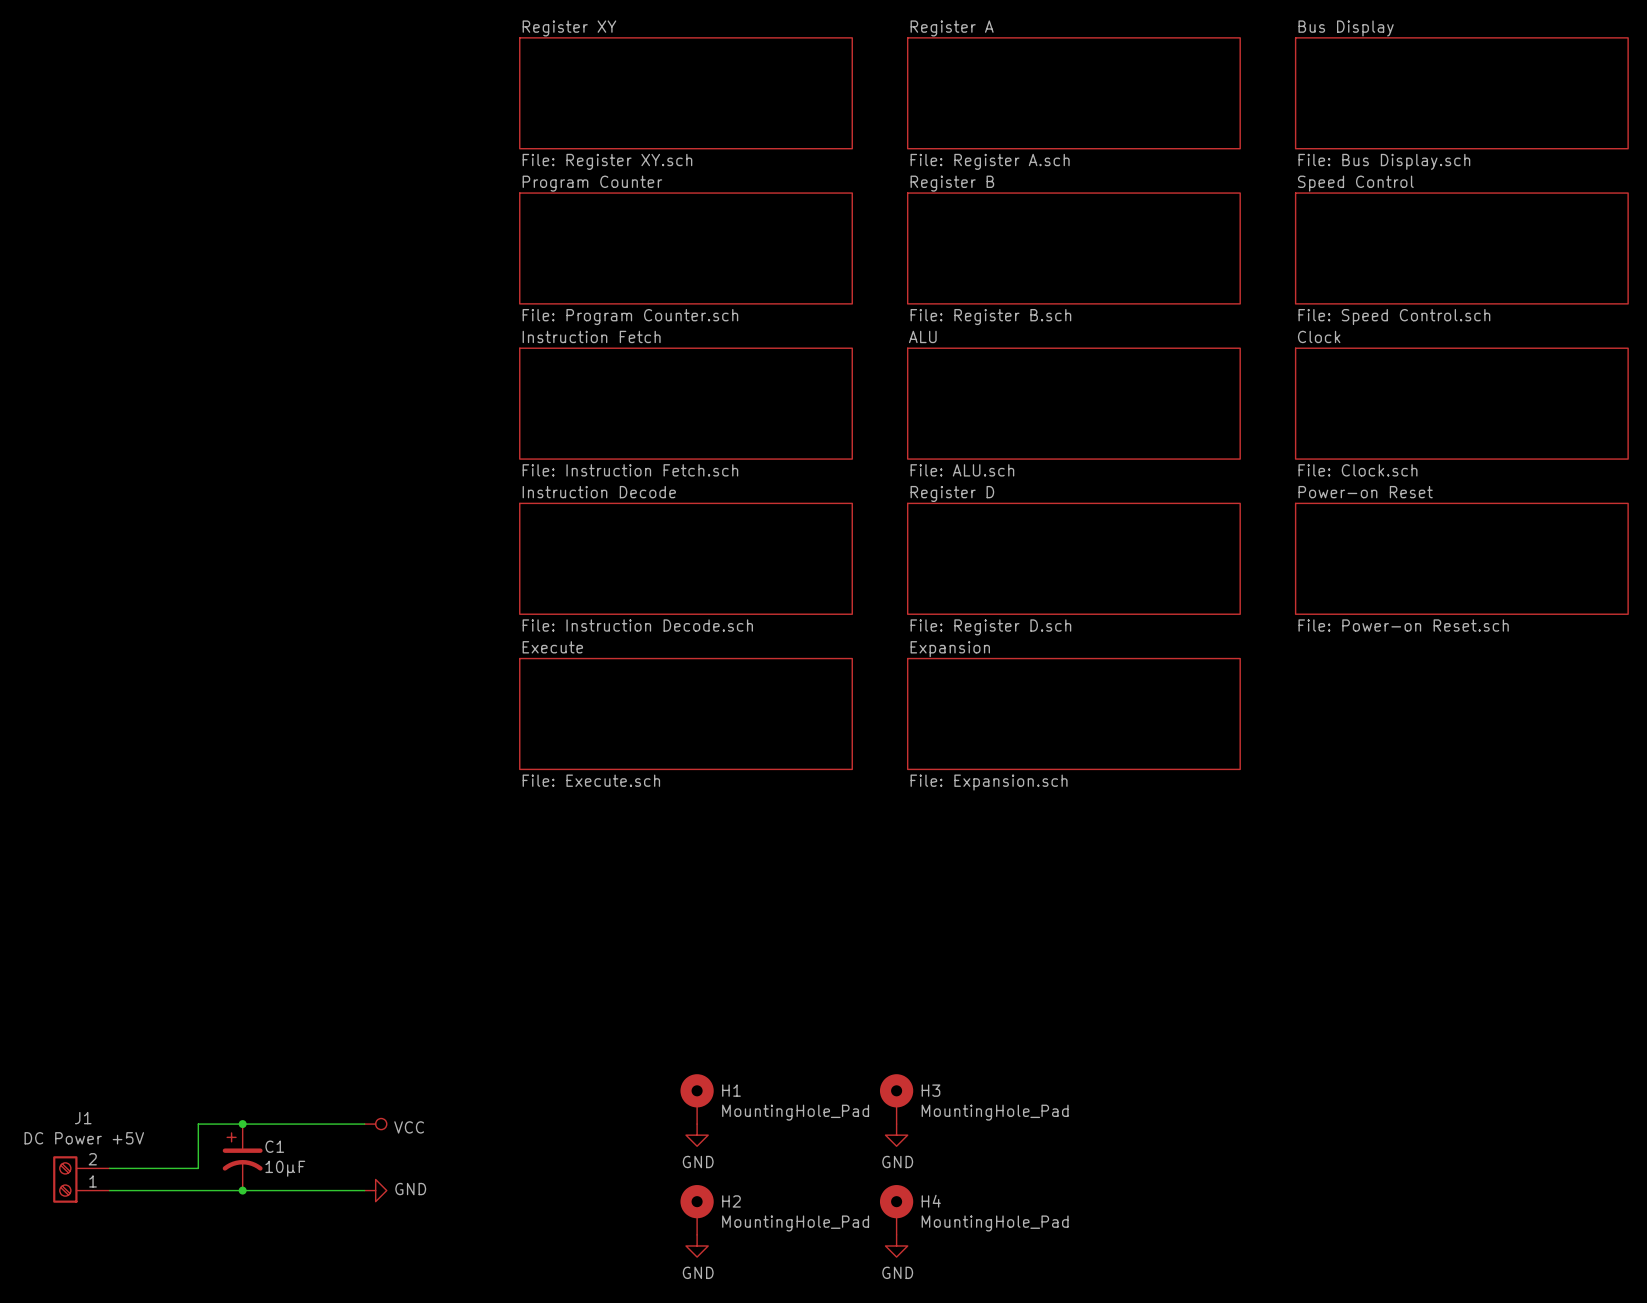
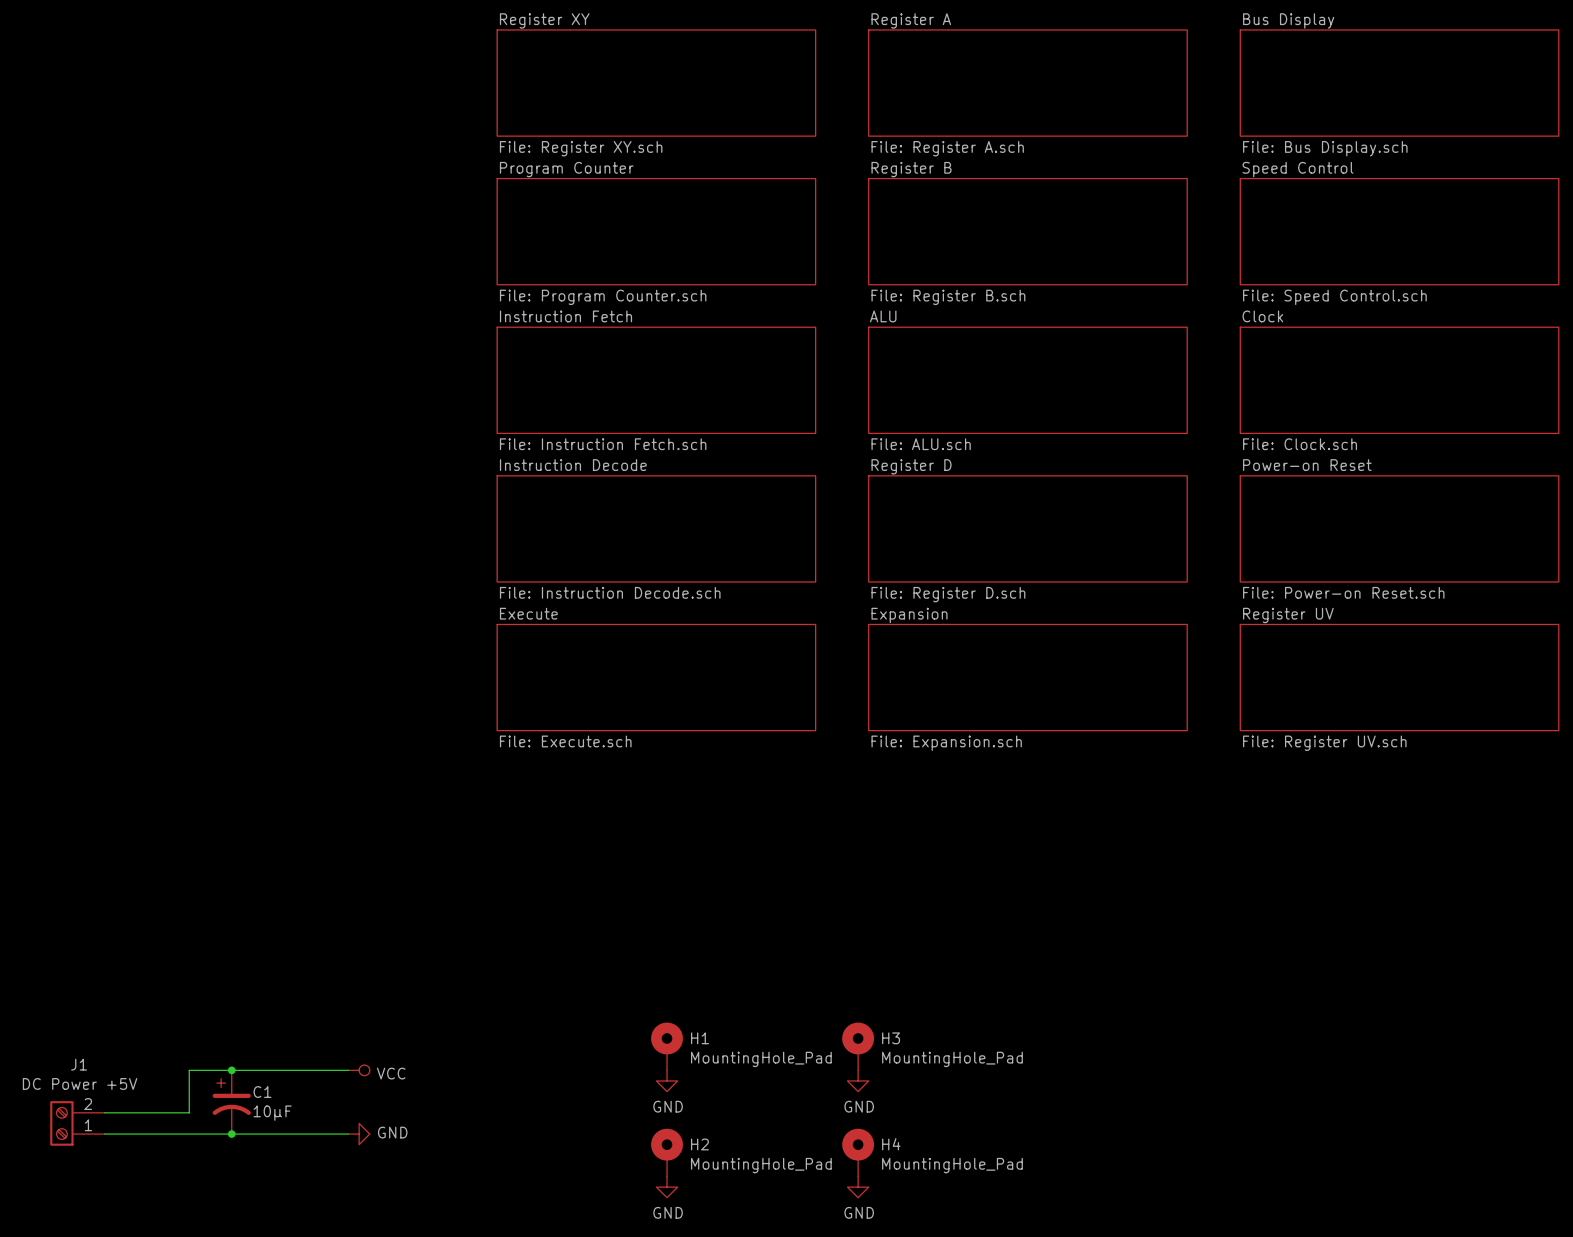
sheet Register UV: none -> File: Register UV.sch (1399, 677)

